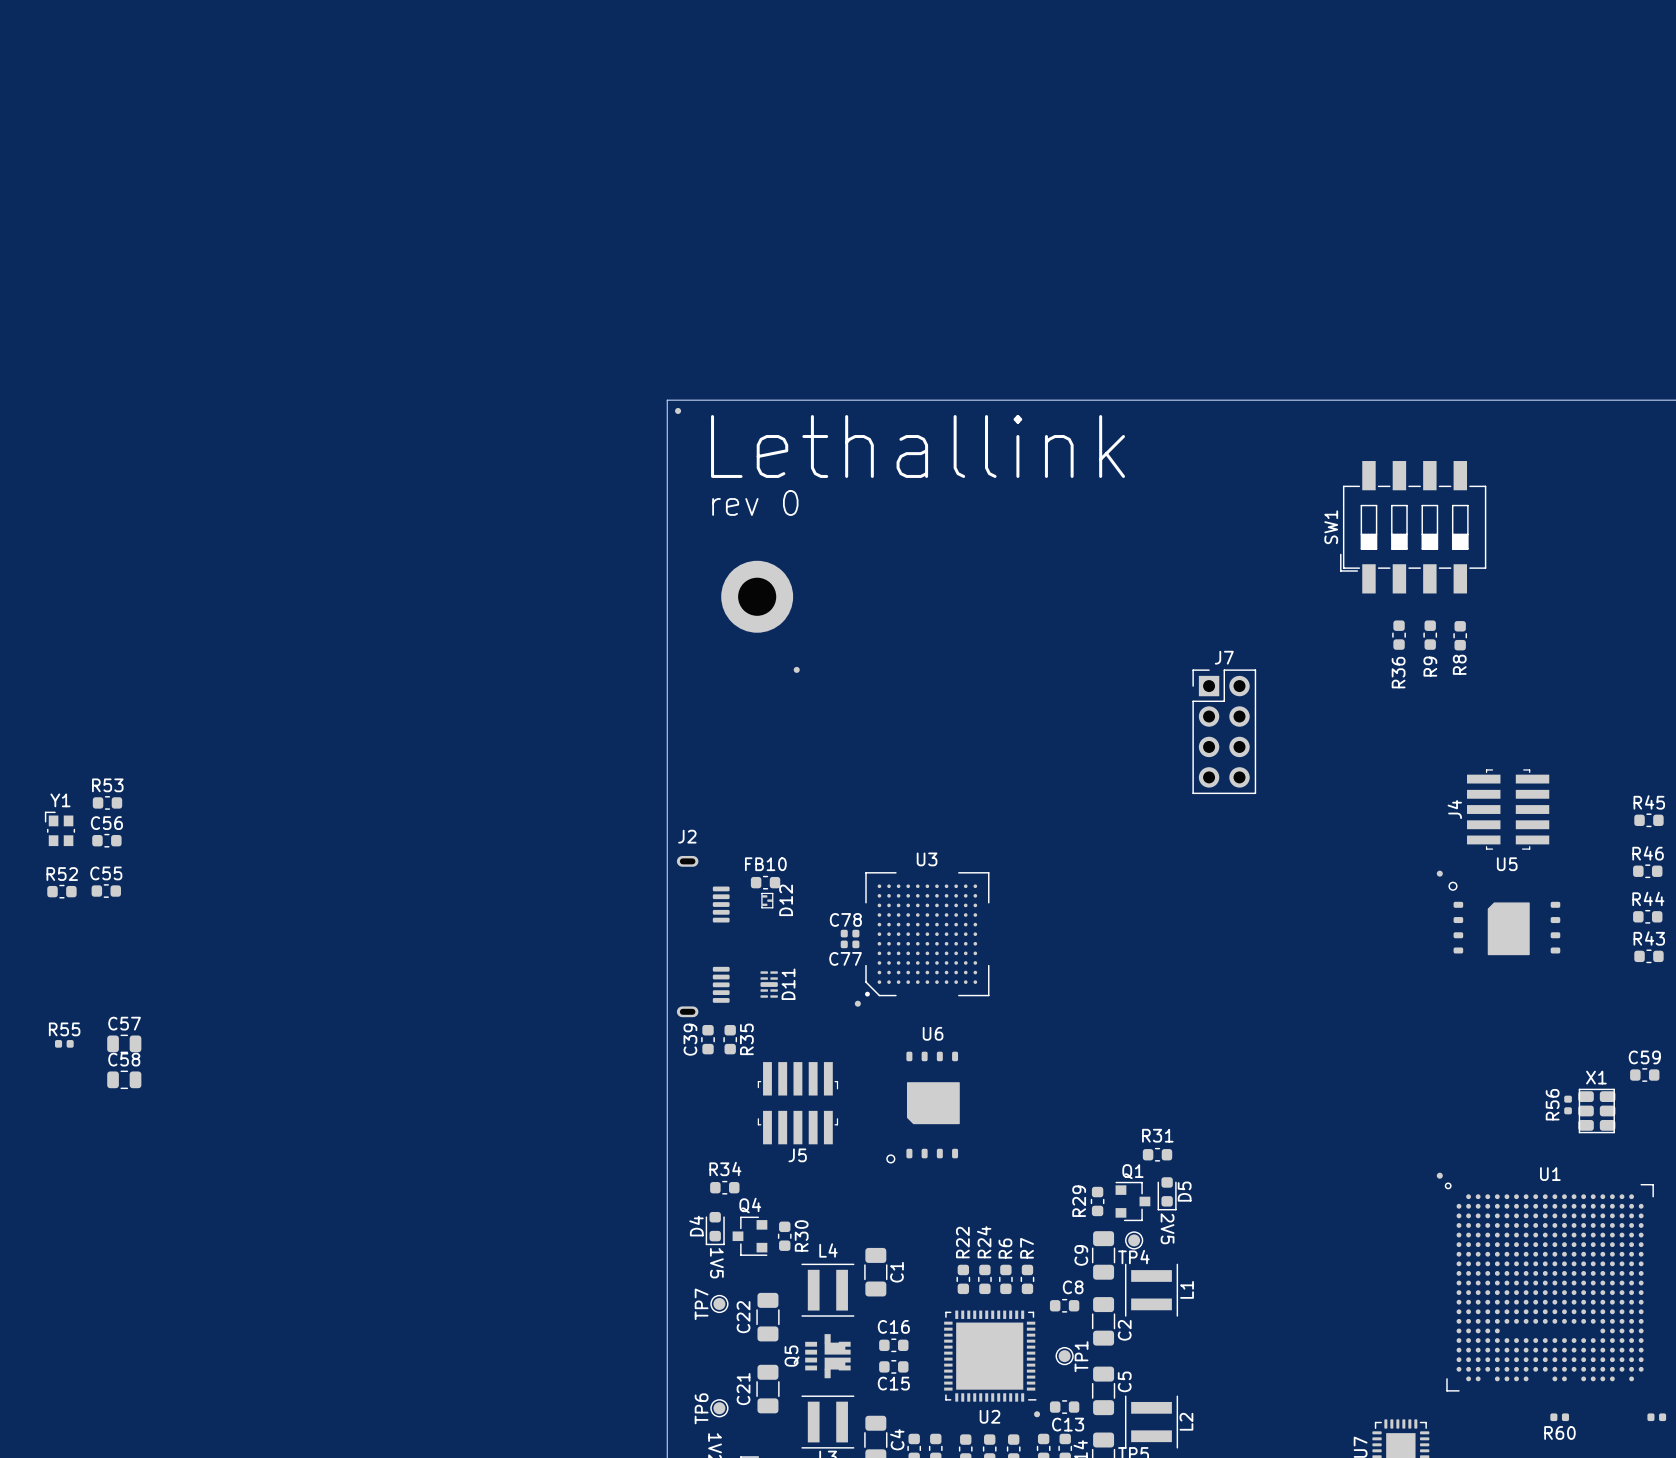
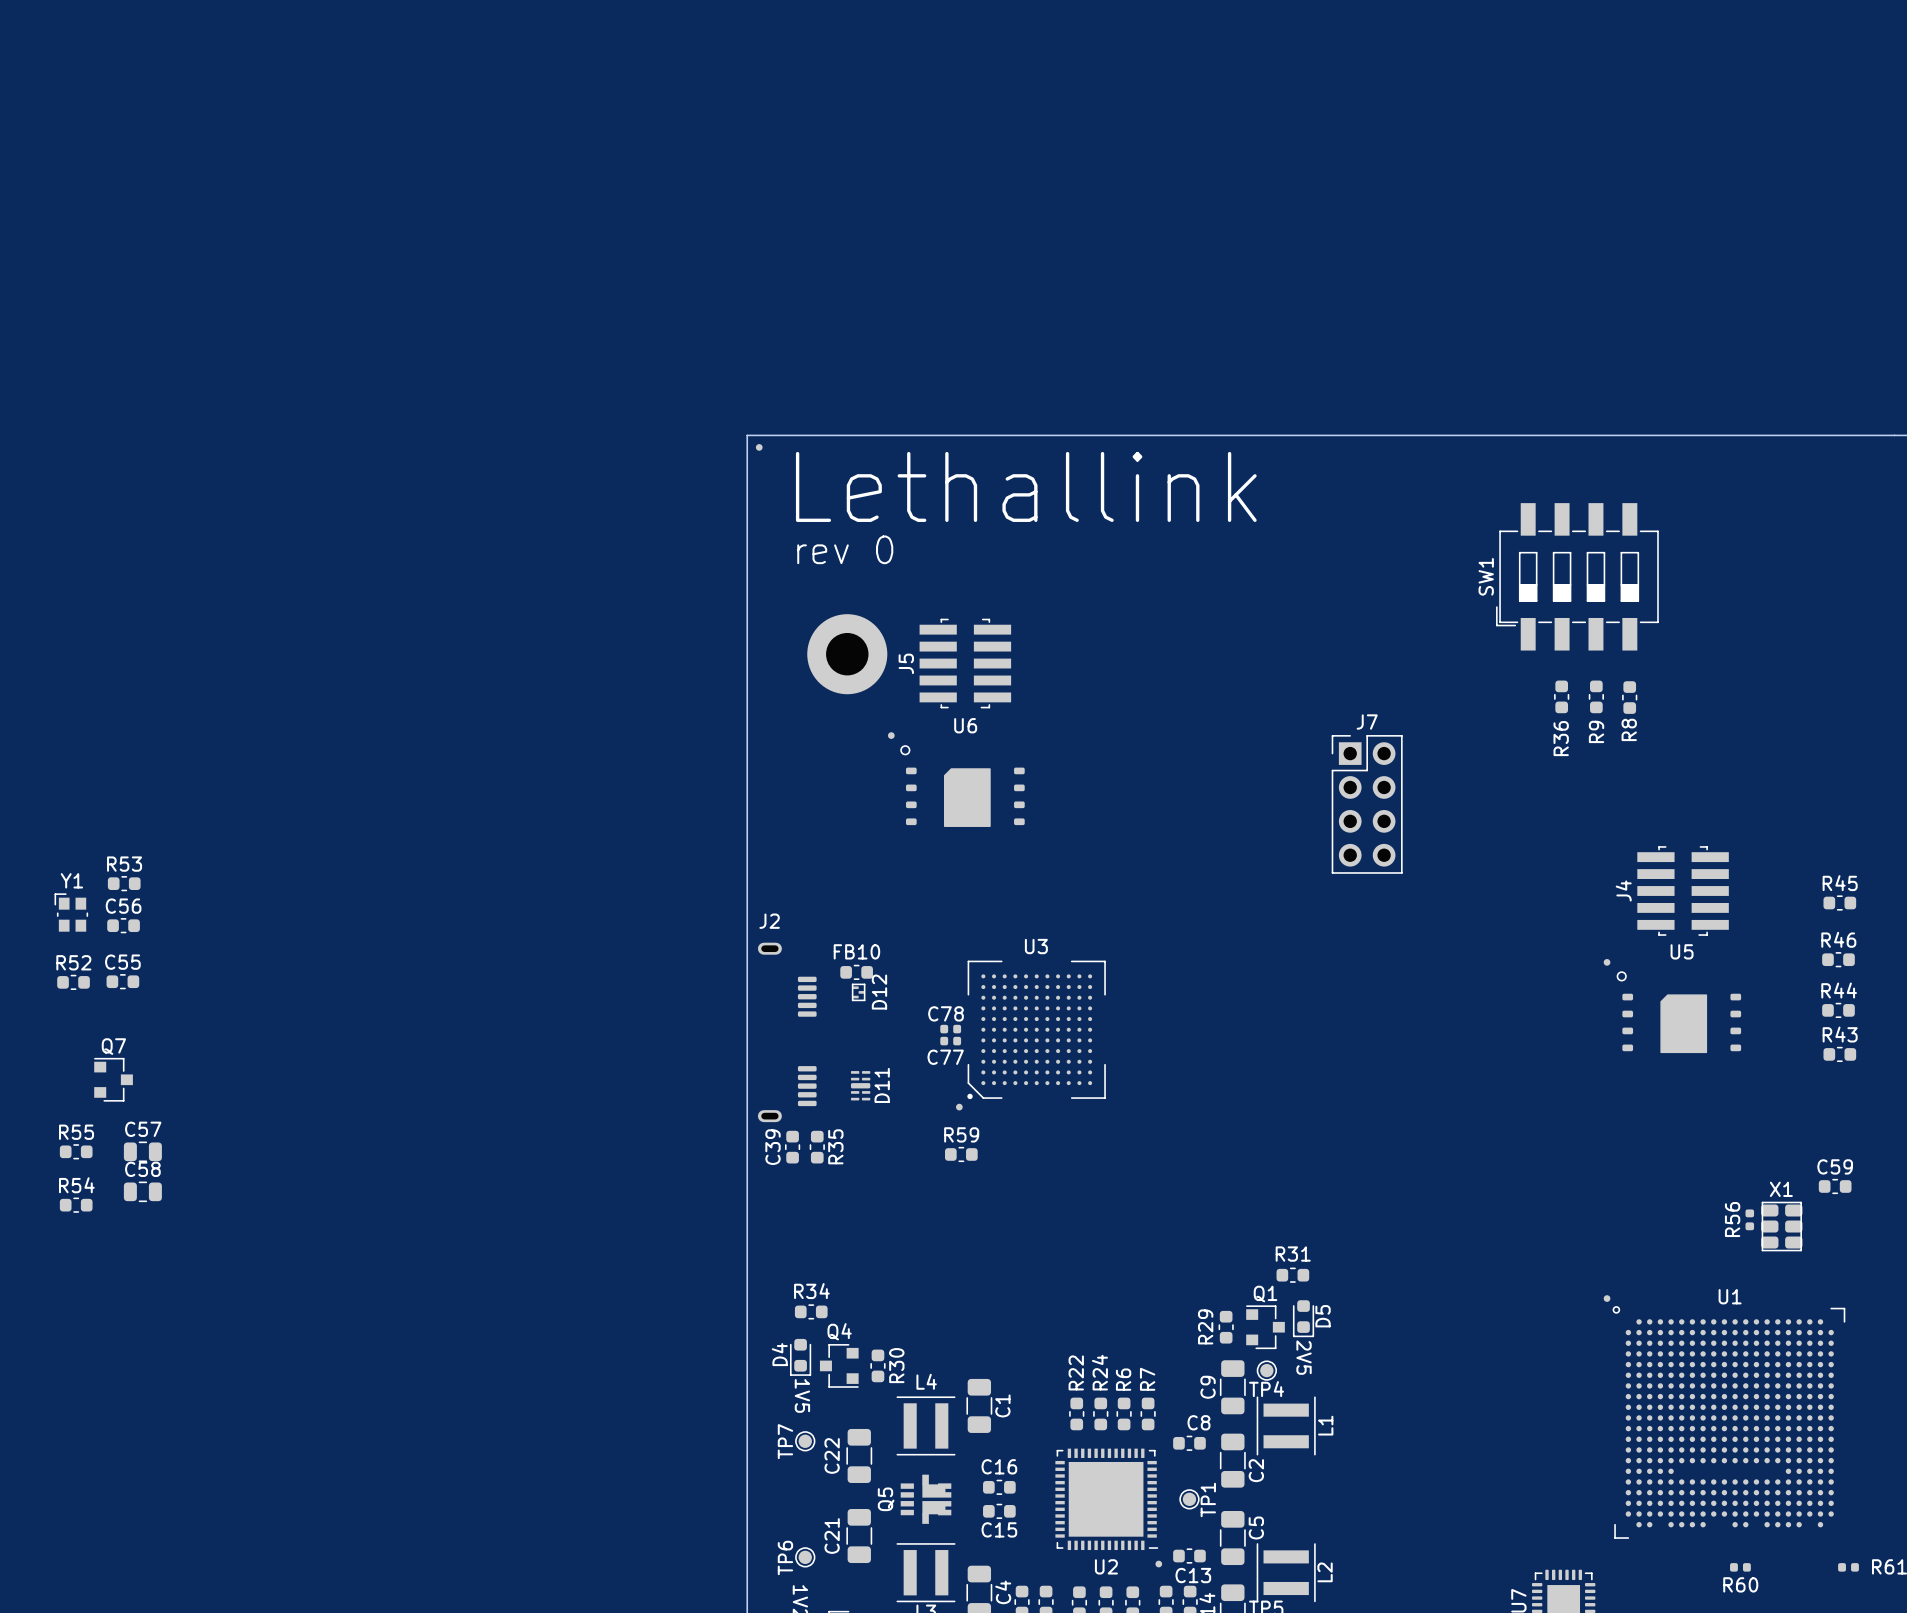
Q7: none -> (113, 1079)
R55 footprint: [55, 1040, 74, 1048] -> [59, 1144, 93, 1160]
R59: none -> (961, 1154)
R54: none -> (76, 1205)
J5 rotation: 0° (797, 1103) -> 90° clockwise (965, 663)
J5 position: (797, 1103) -> (965, 663)
U6 rotation: 0° (923, 1107) -> 90° clockwise (962, 786)
U6 position: (923, 1107) -> (962, 786)

